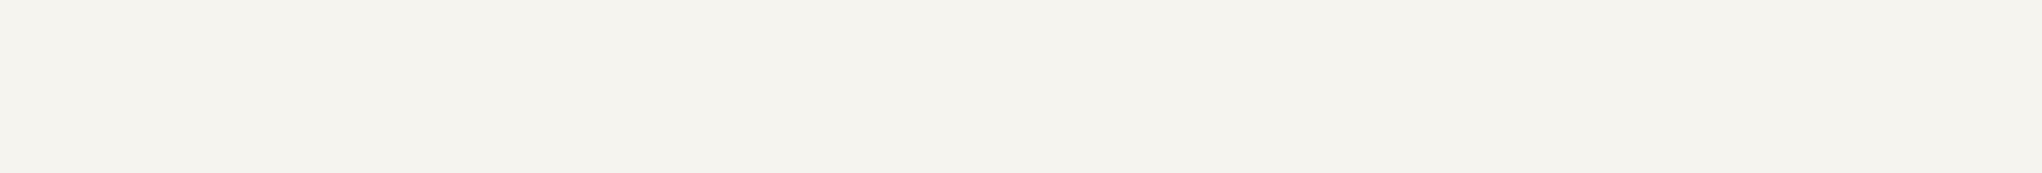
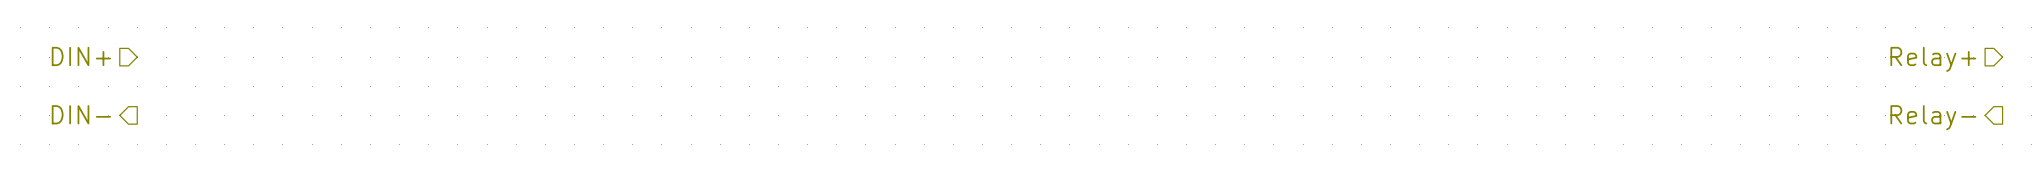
hierarchical label: none -> DIN+ (81, 56)
hierarchical label: none -> Relay+ (1933, 59)
hierarchical label: none -> DIN- (81, 114)
hierarchical label: none -> Relay- (1933, 117)

